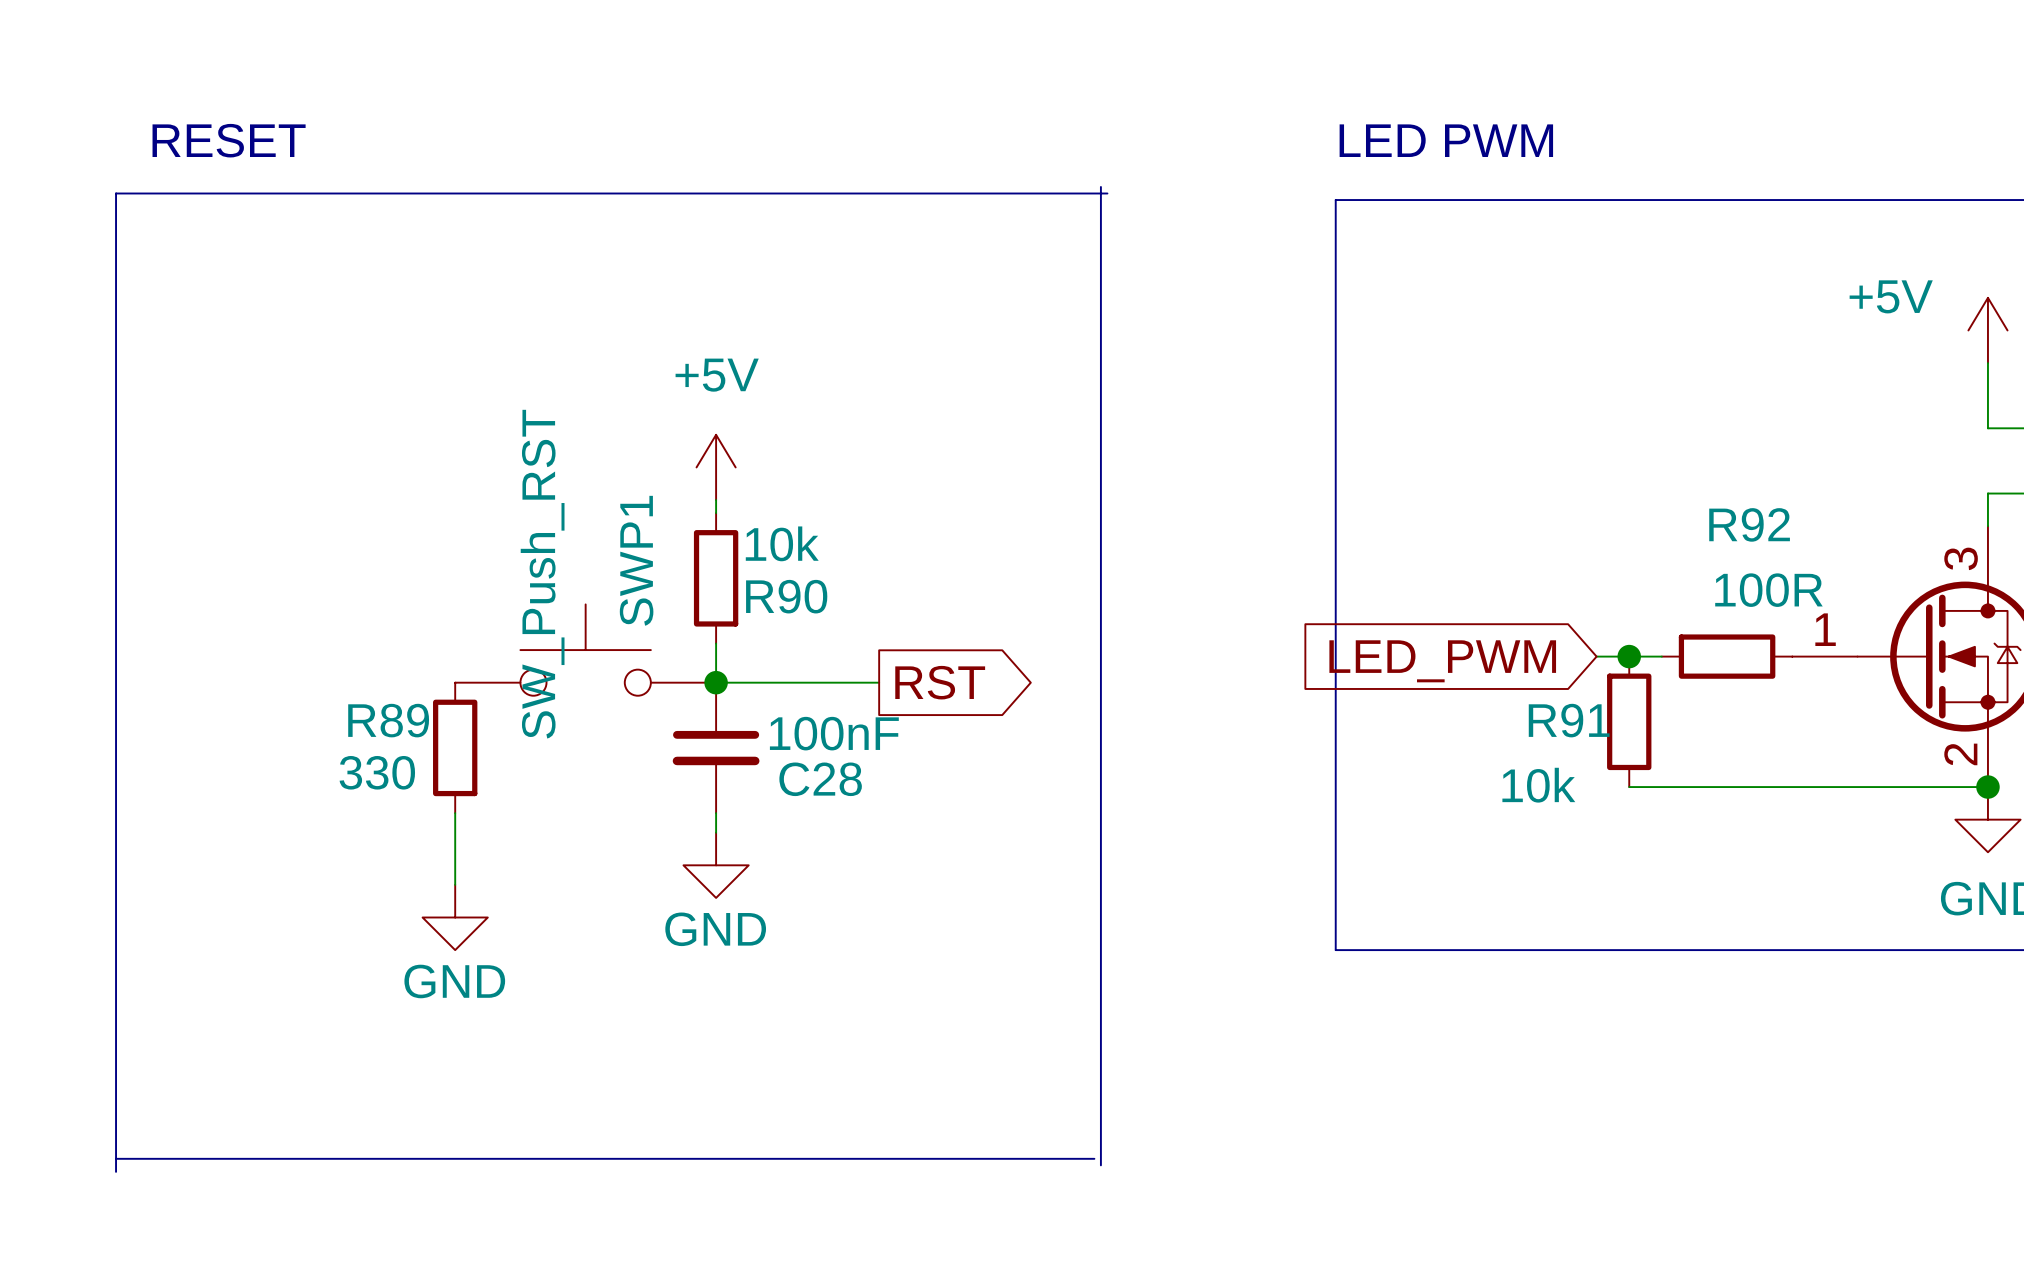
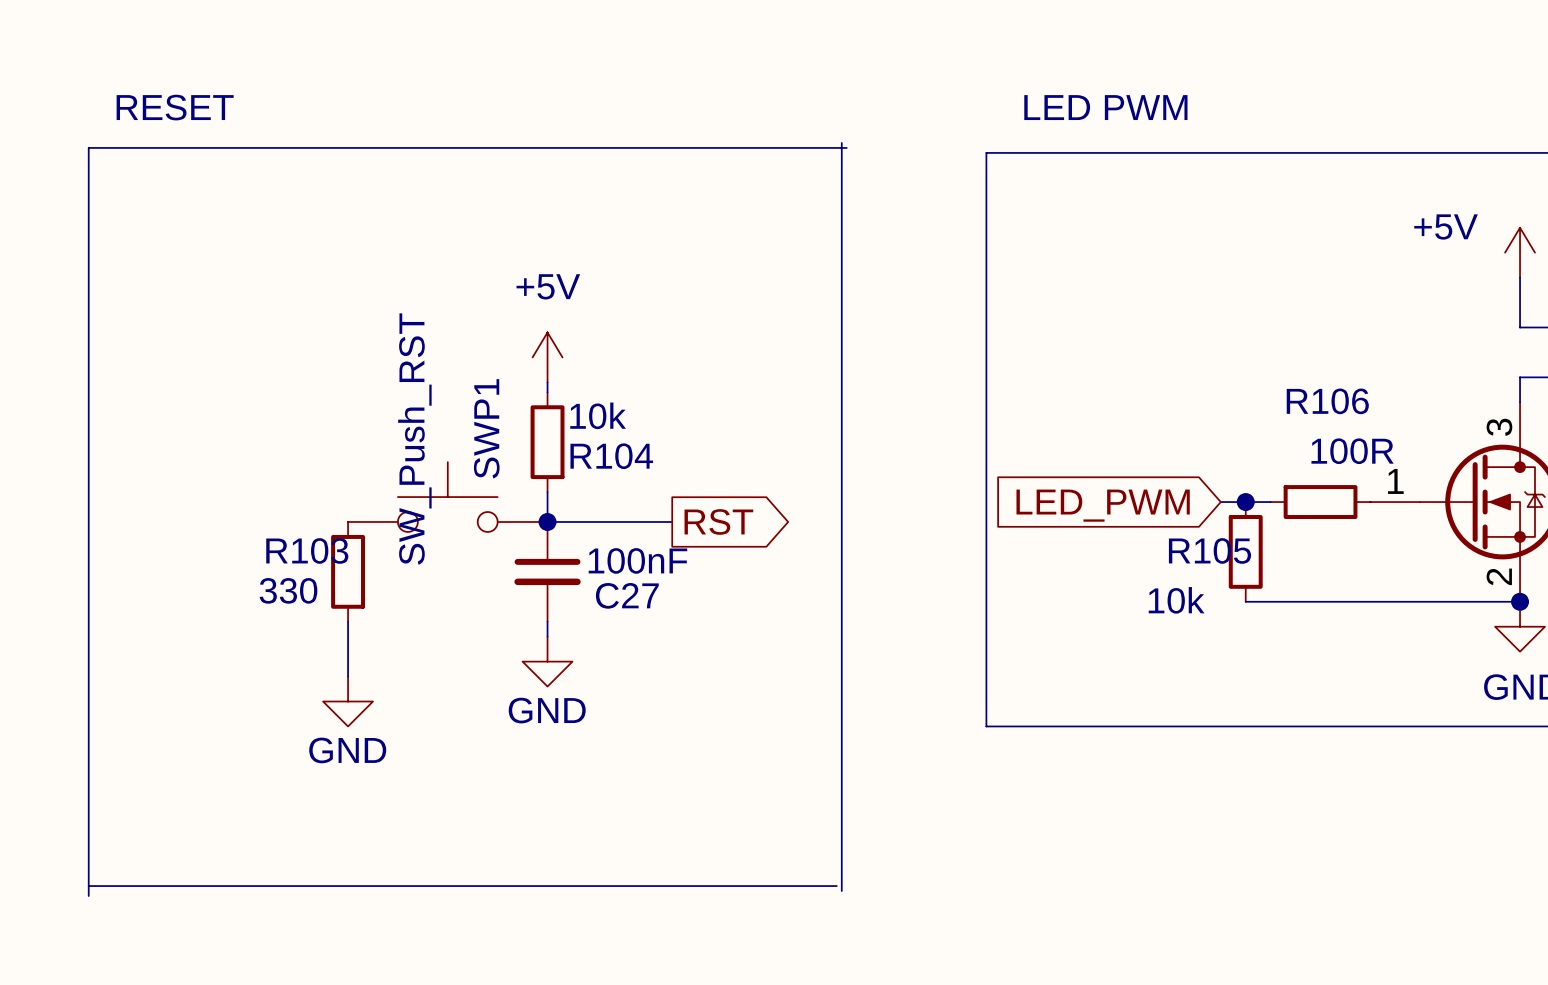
line: (1335, 200) (1335, 950) -> (1021, 152) (986, 152) (986, 726) (1021, 726)
R92 name: R92 (1749, 524) -> R106 (1327, 401)
R90 name: R90 (786, 596) -> R104 (611, 456)
R89 name: R89 (388, 720) -> R103 (307, 550)
R91 name: R91 (1569, 720) -> R105 (1209, 550)
C28 name: C28 (820, 779) -> C27 (627, 595)

